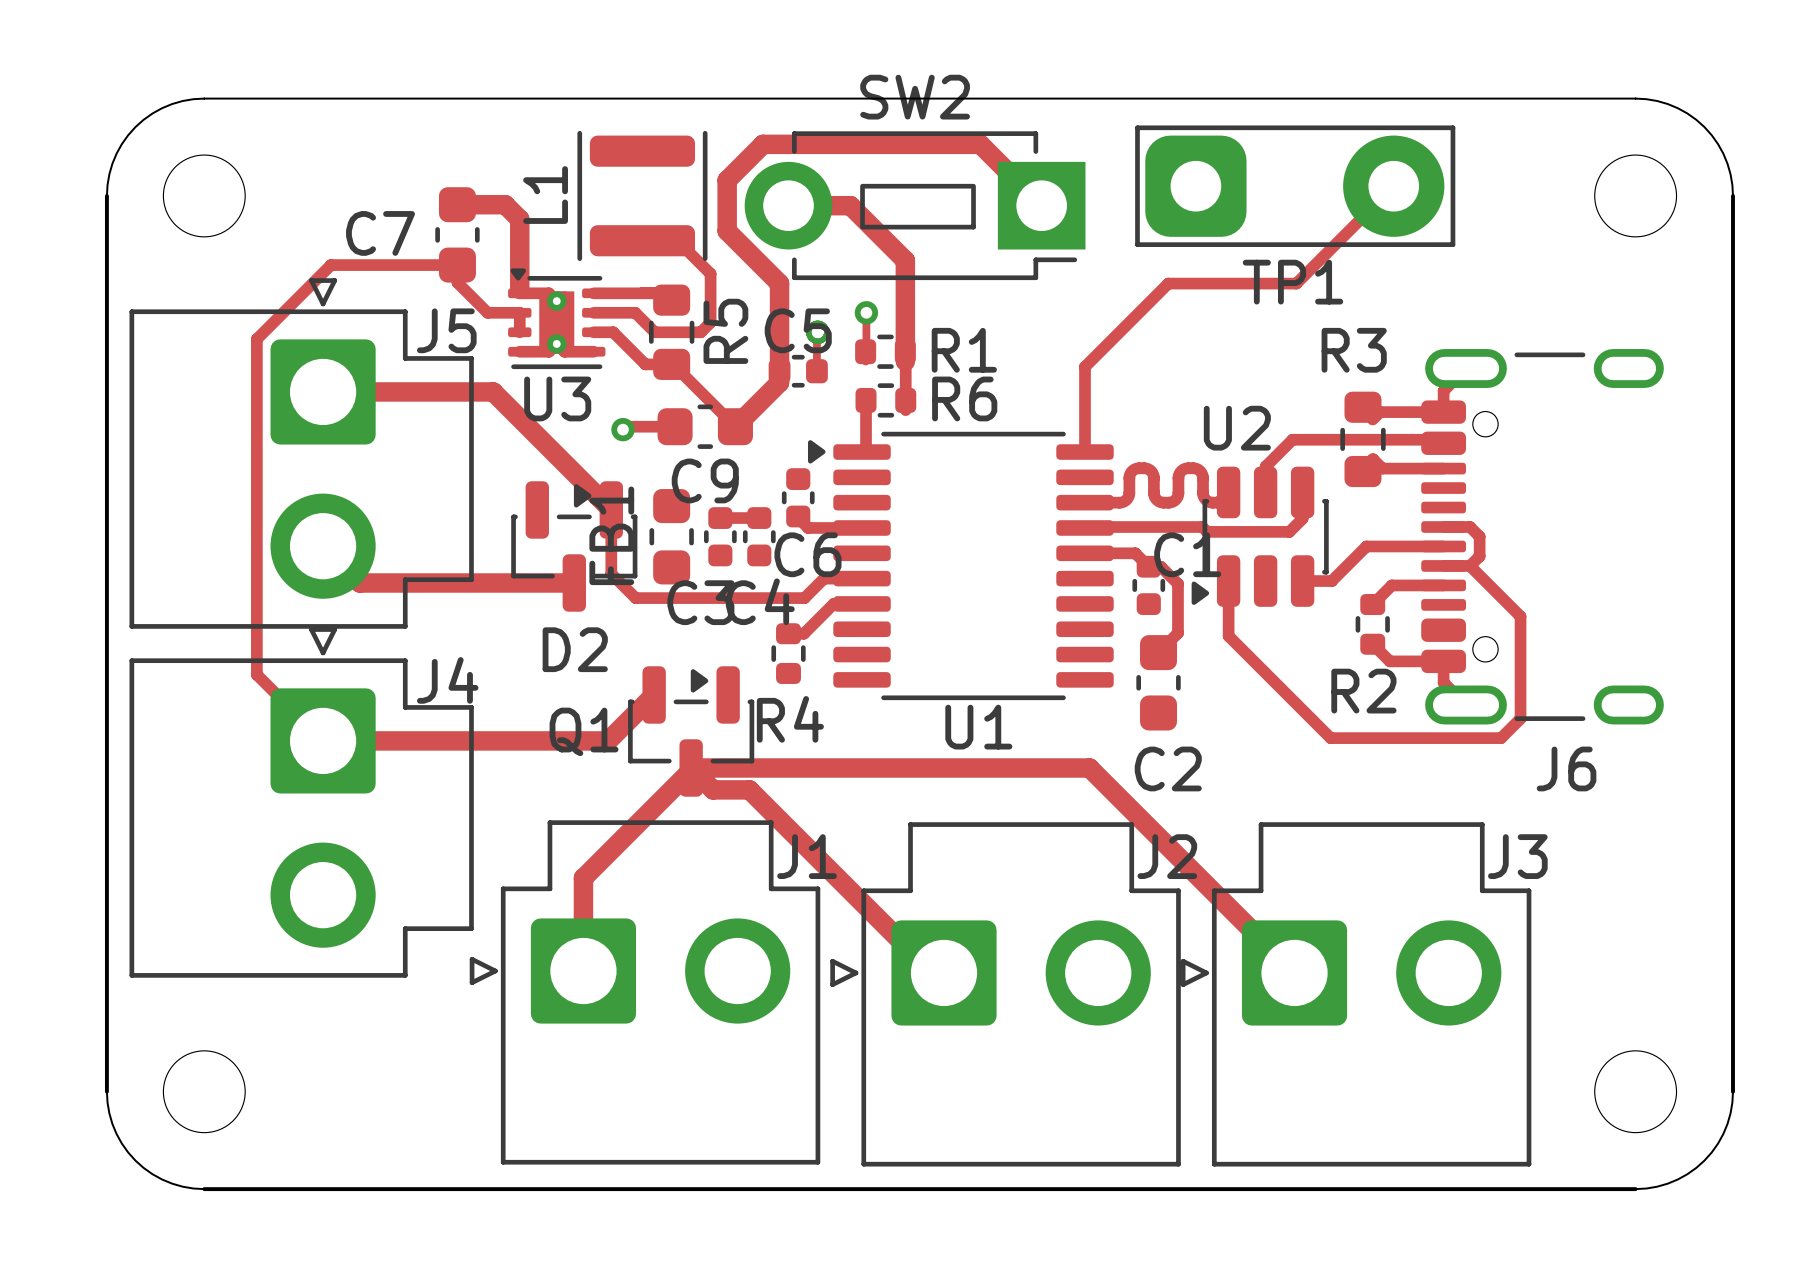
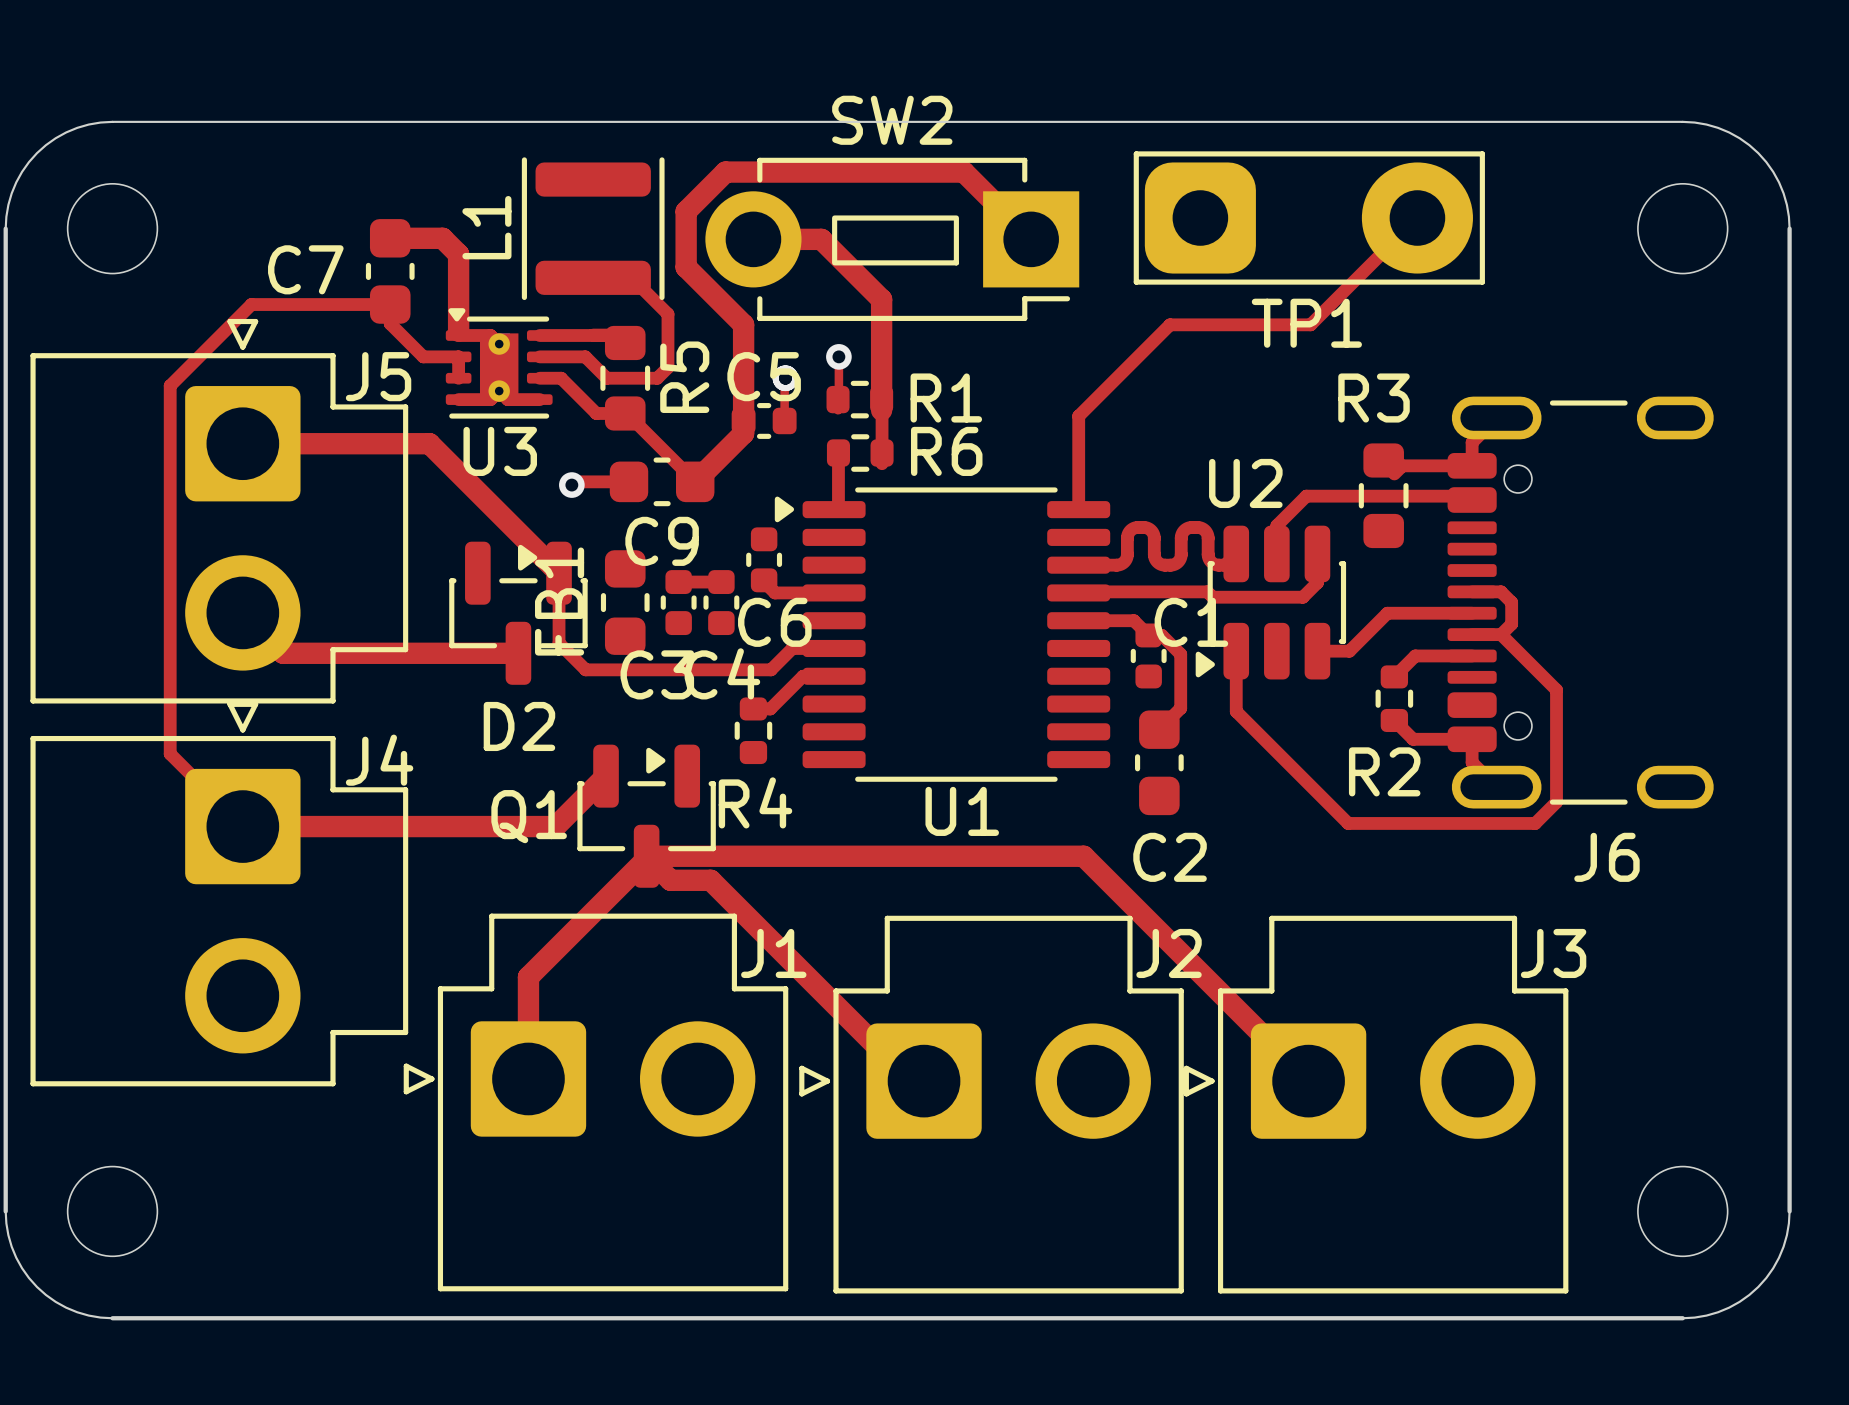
top track: (1373, 459) (1382, 468) (1443, 468) -> none

